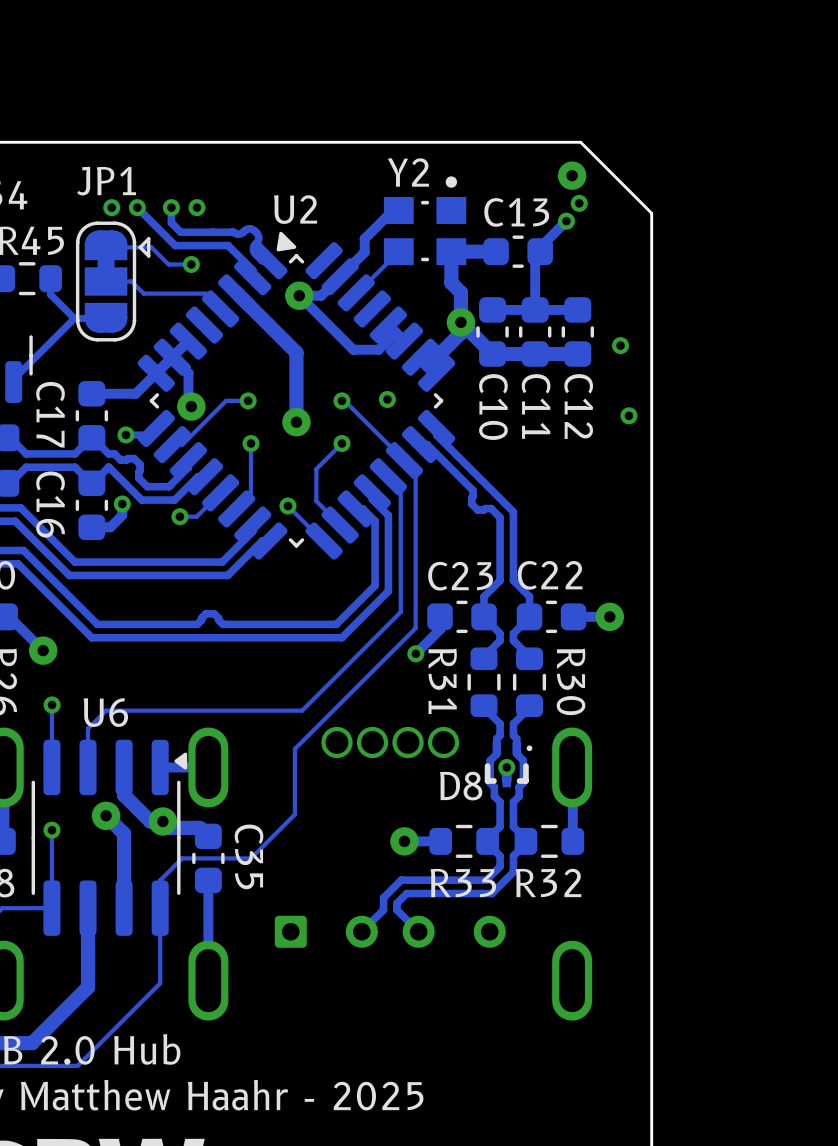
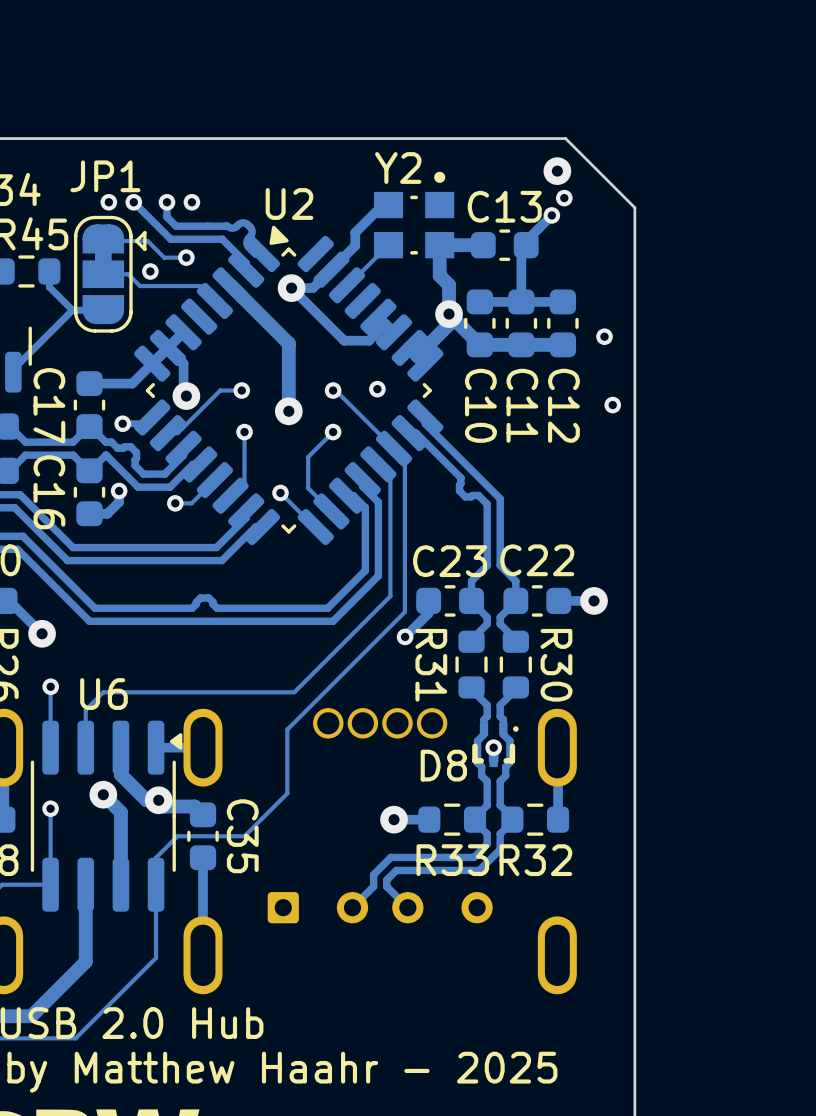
via: none -> (150, 271)

